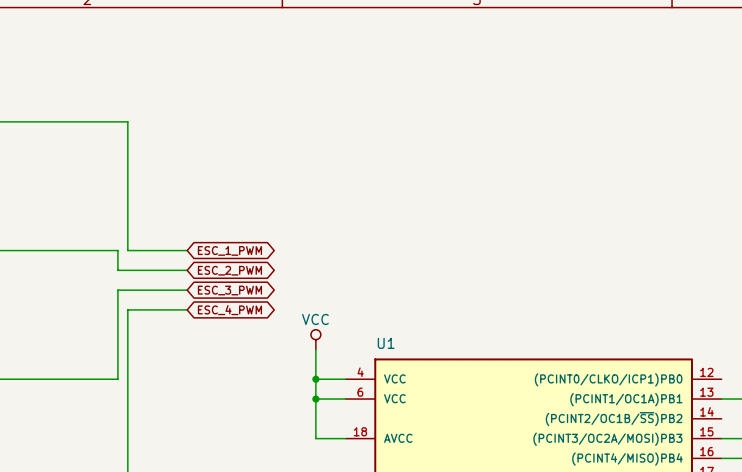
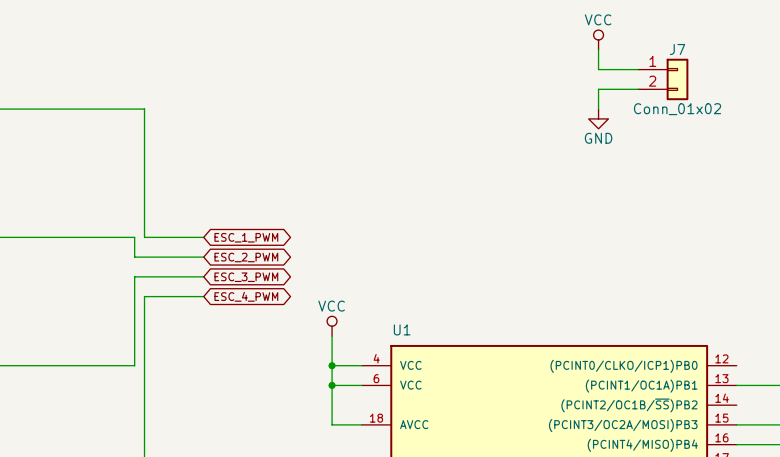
power symbol: none -> VCC (598, 39)
wire: none -> (598, 49) (598, 69) (638, 69)
J7: none -> Conn_01x02 (663, 79)
wire: none -> (638, 89) (598, 89) (598, 109)
power symbol: none -> GND (598, 118)

